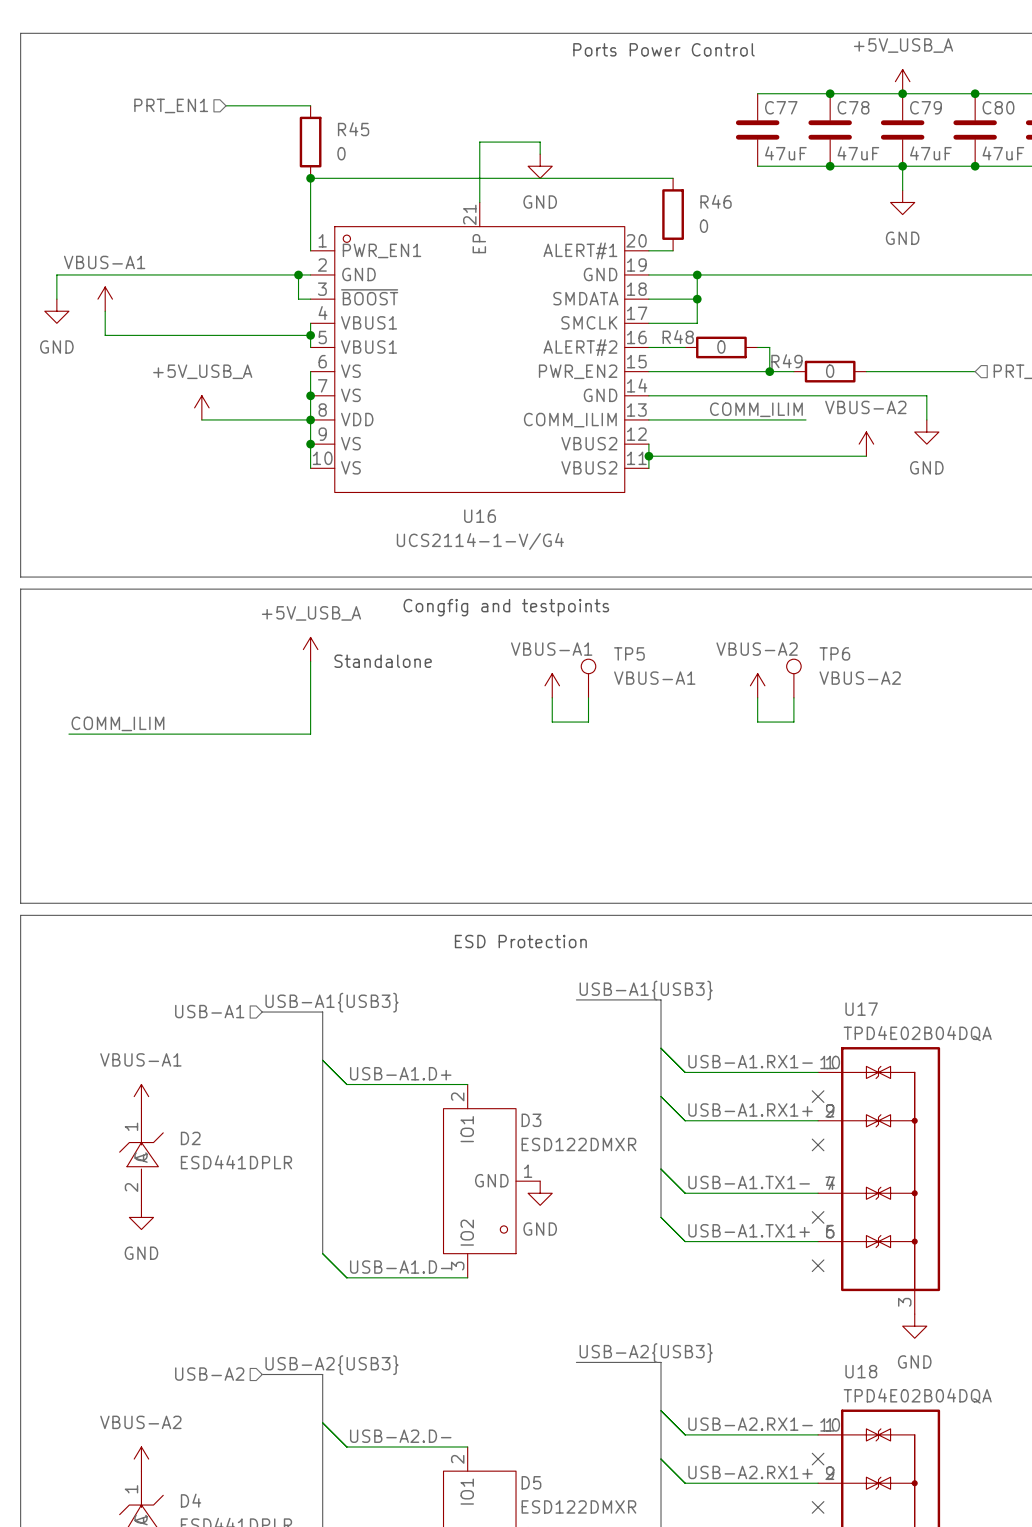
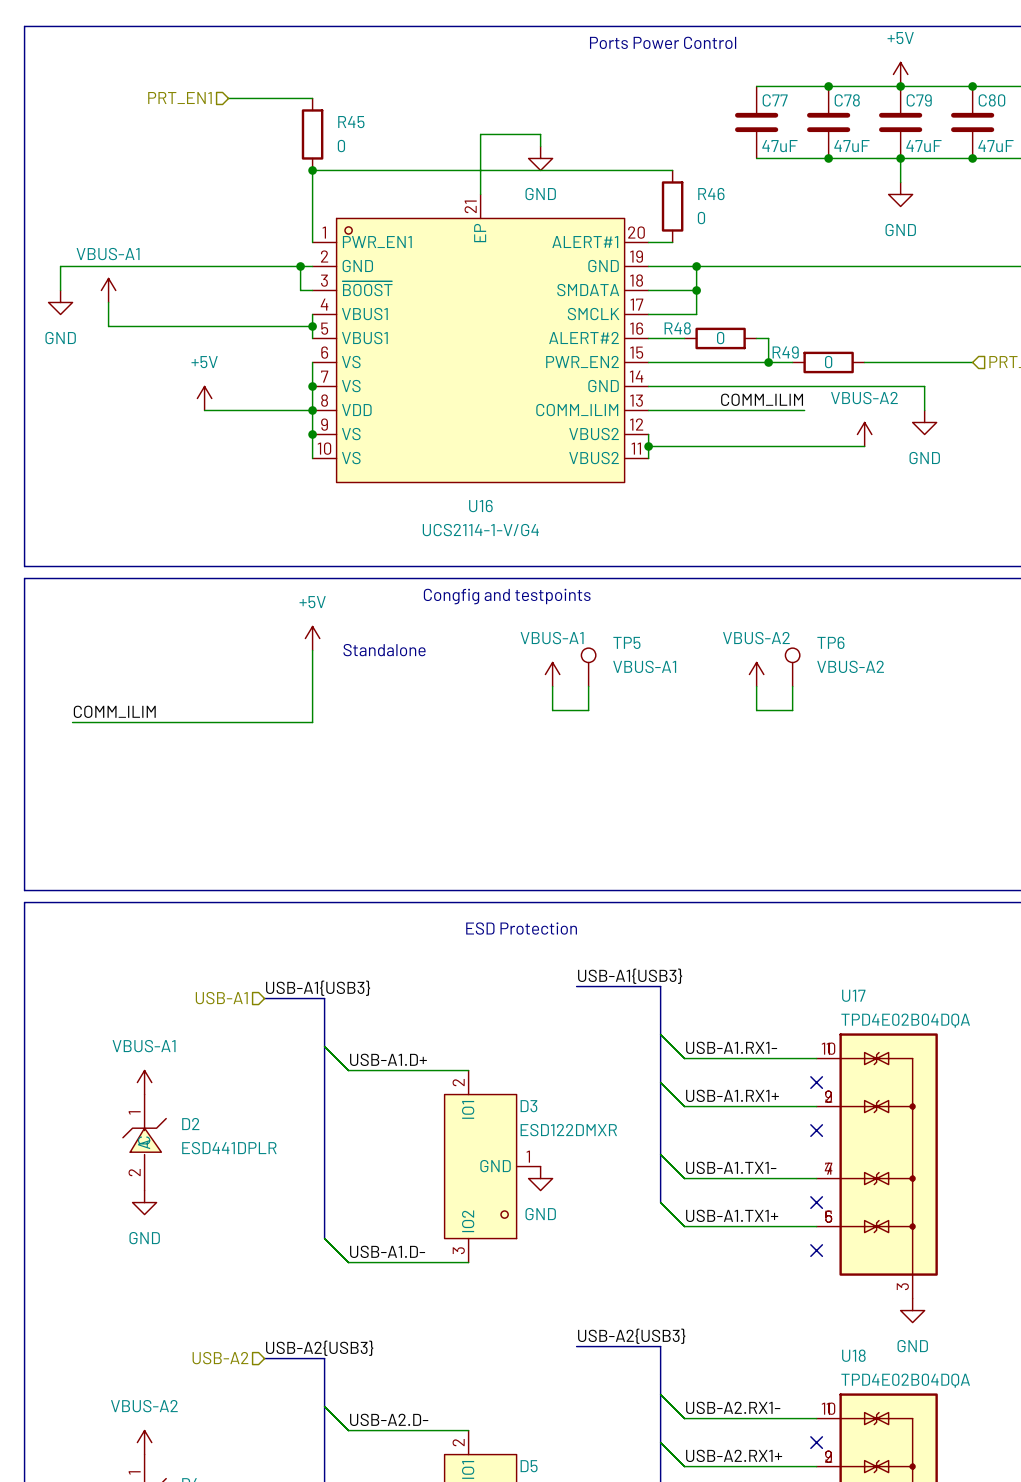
power symbol: +5V_USB_A (902, 81) -> +5V (900, 74)
power symbol: +5V_USB_A (201, 407) -> +5V (204, 398)
power symbol: +5V_USB_A (310, 649) -> +5V (312, 638)

